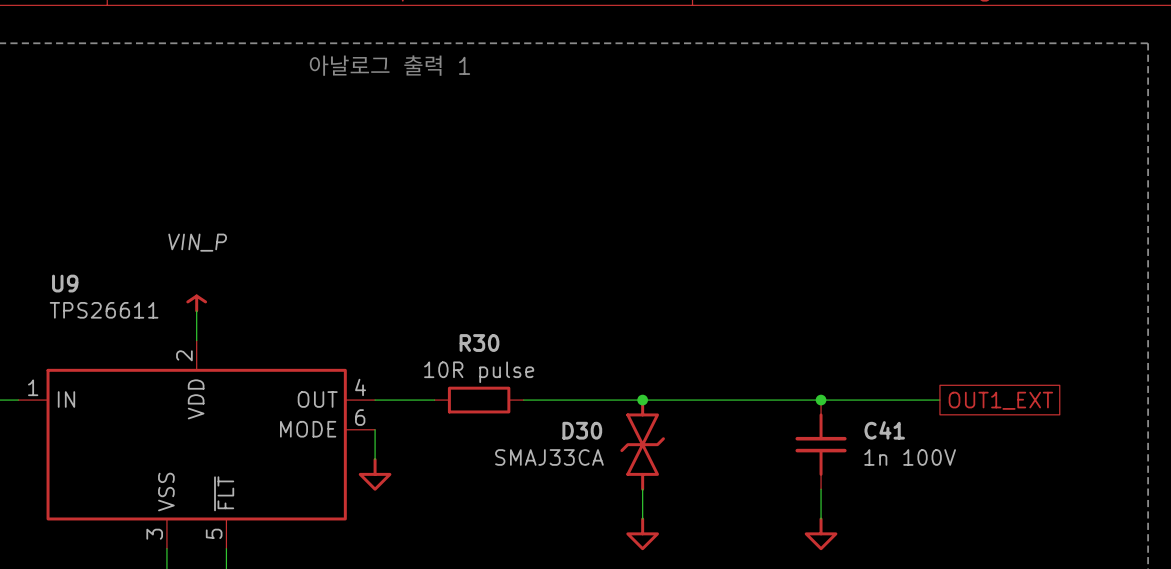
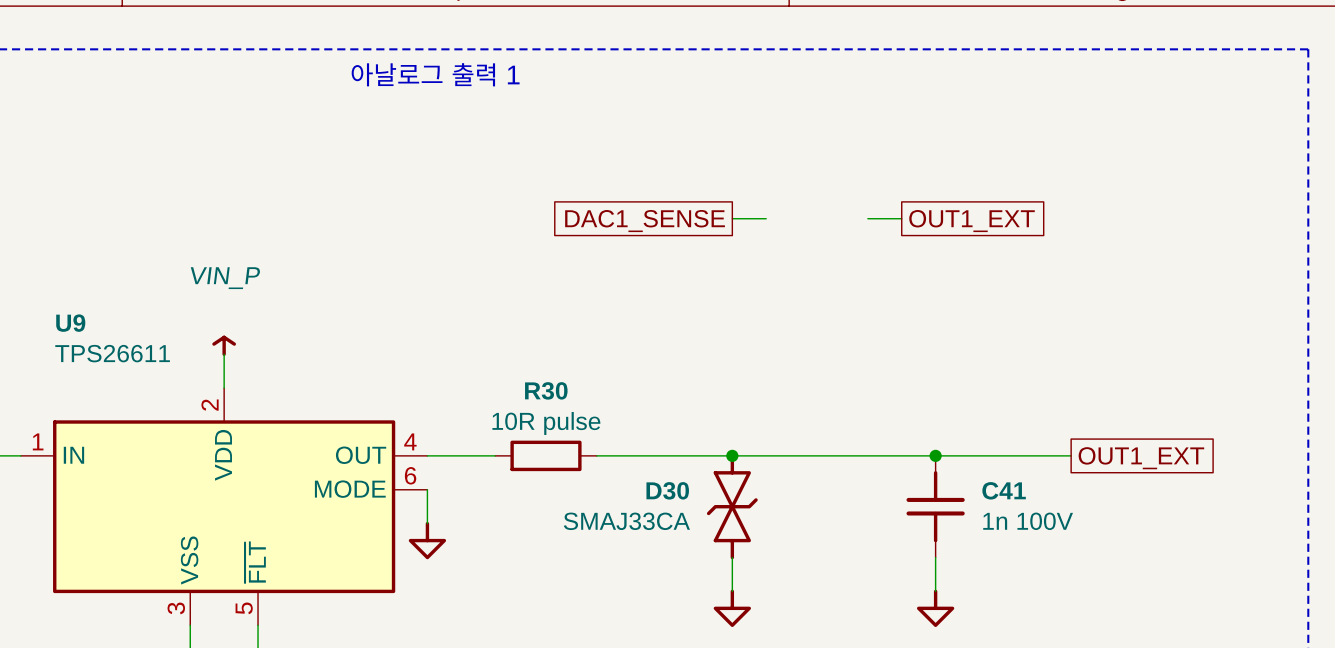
wire: none -> (732, 218) (766, 218)
wire: none -> (867, 218) (901, 218)
global label: none -> DAC1_SENSE (645, 221)
global label: none -> OUT1_EXT (972, 221)

